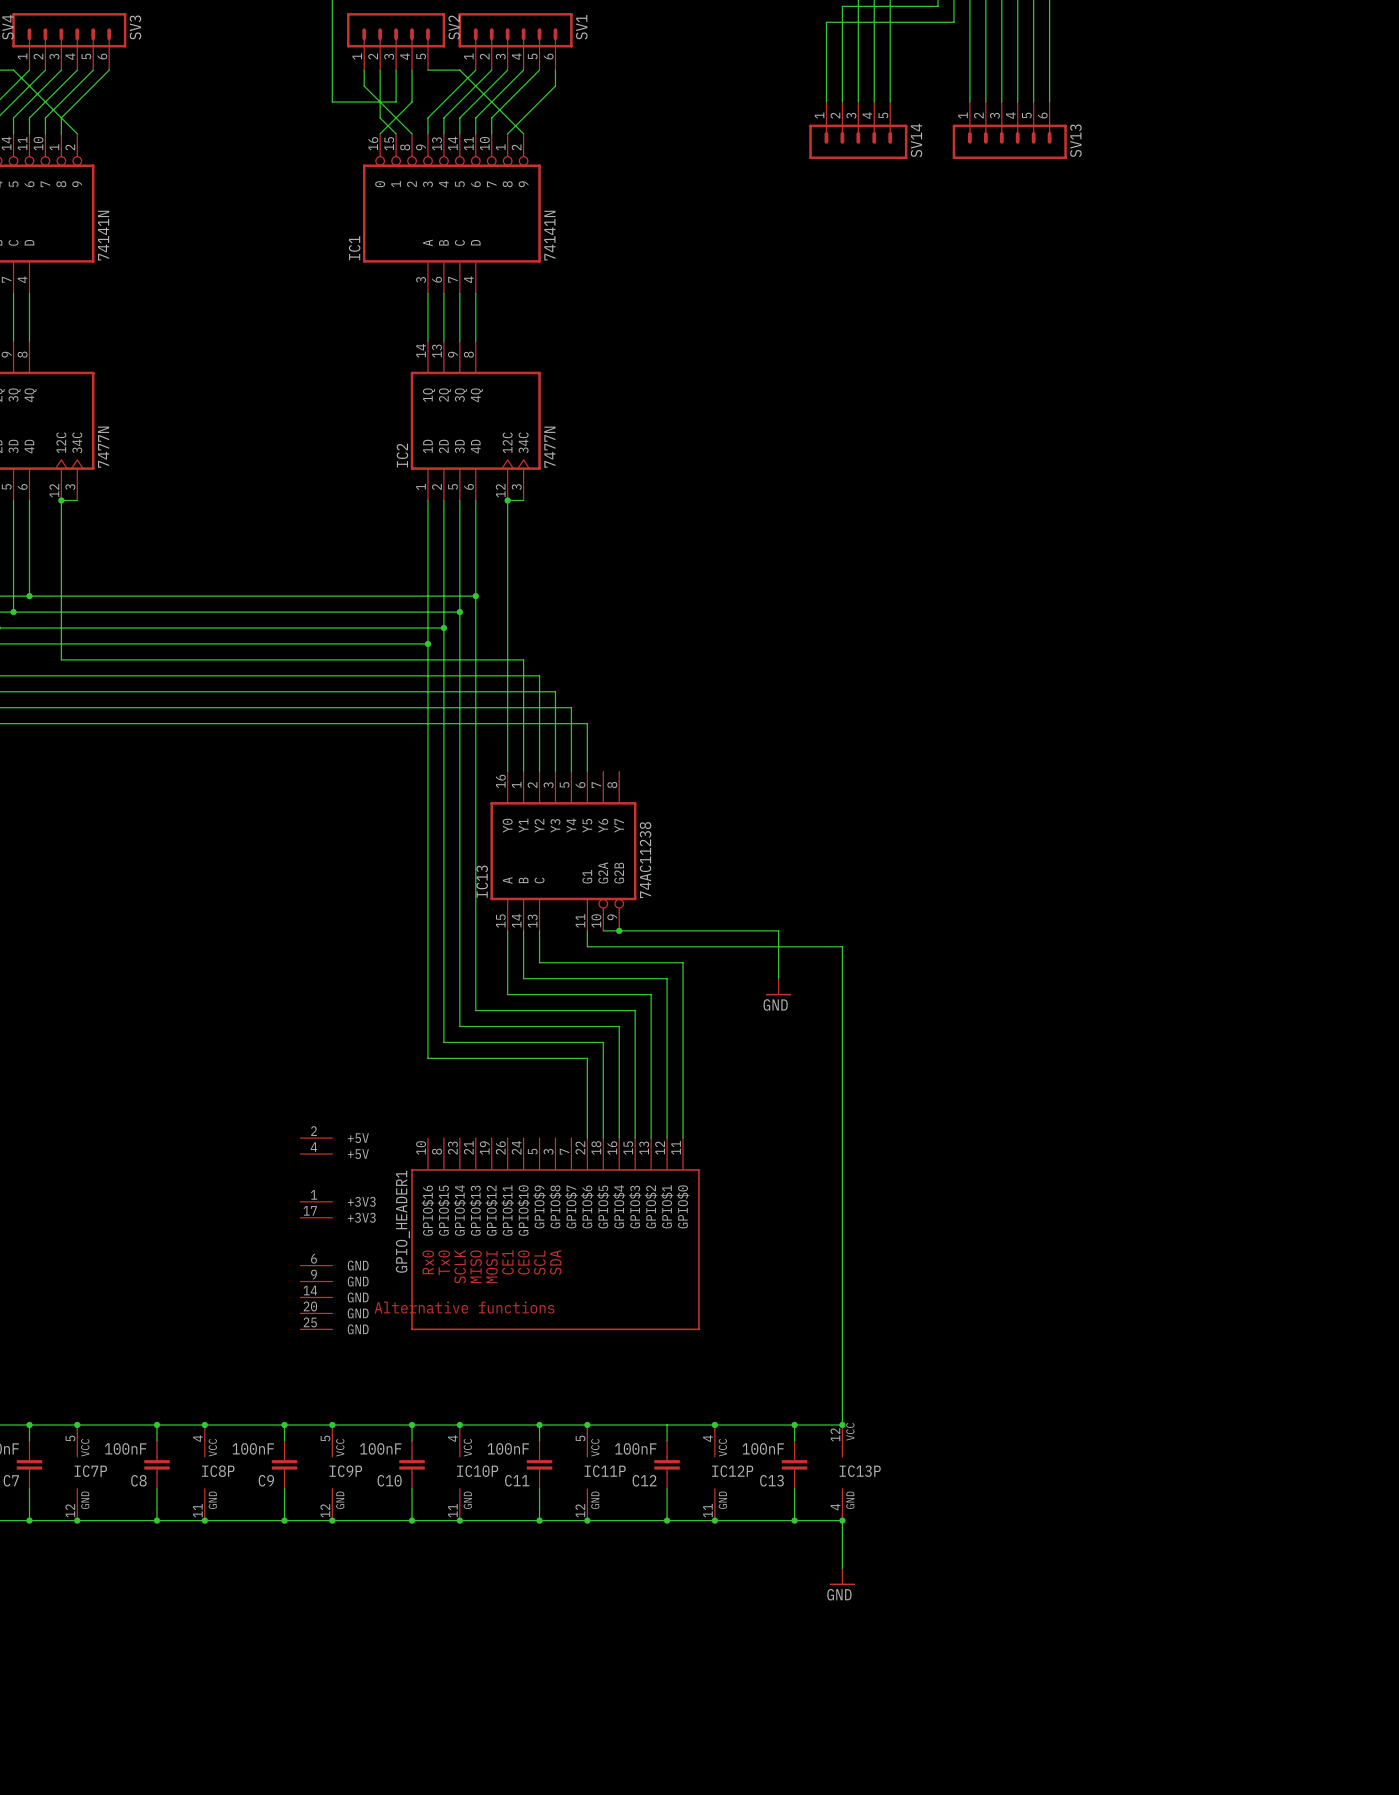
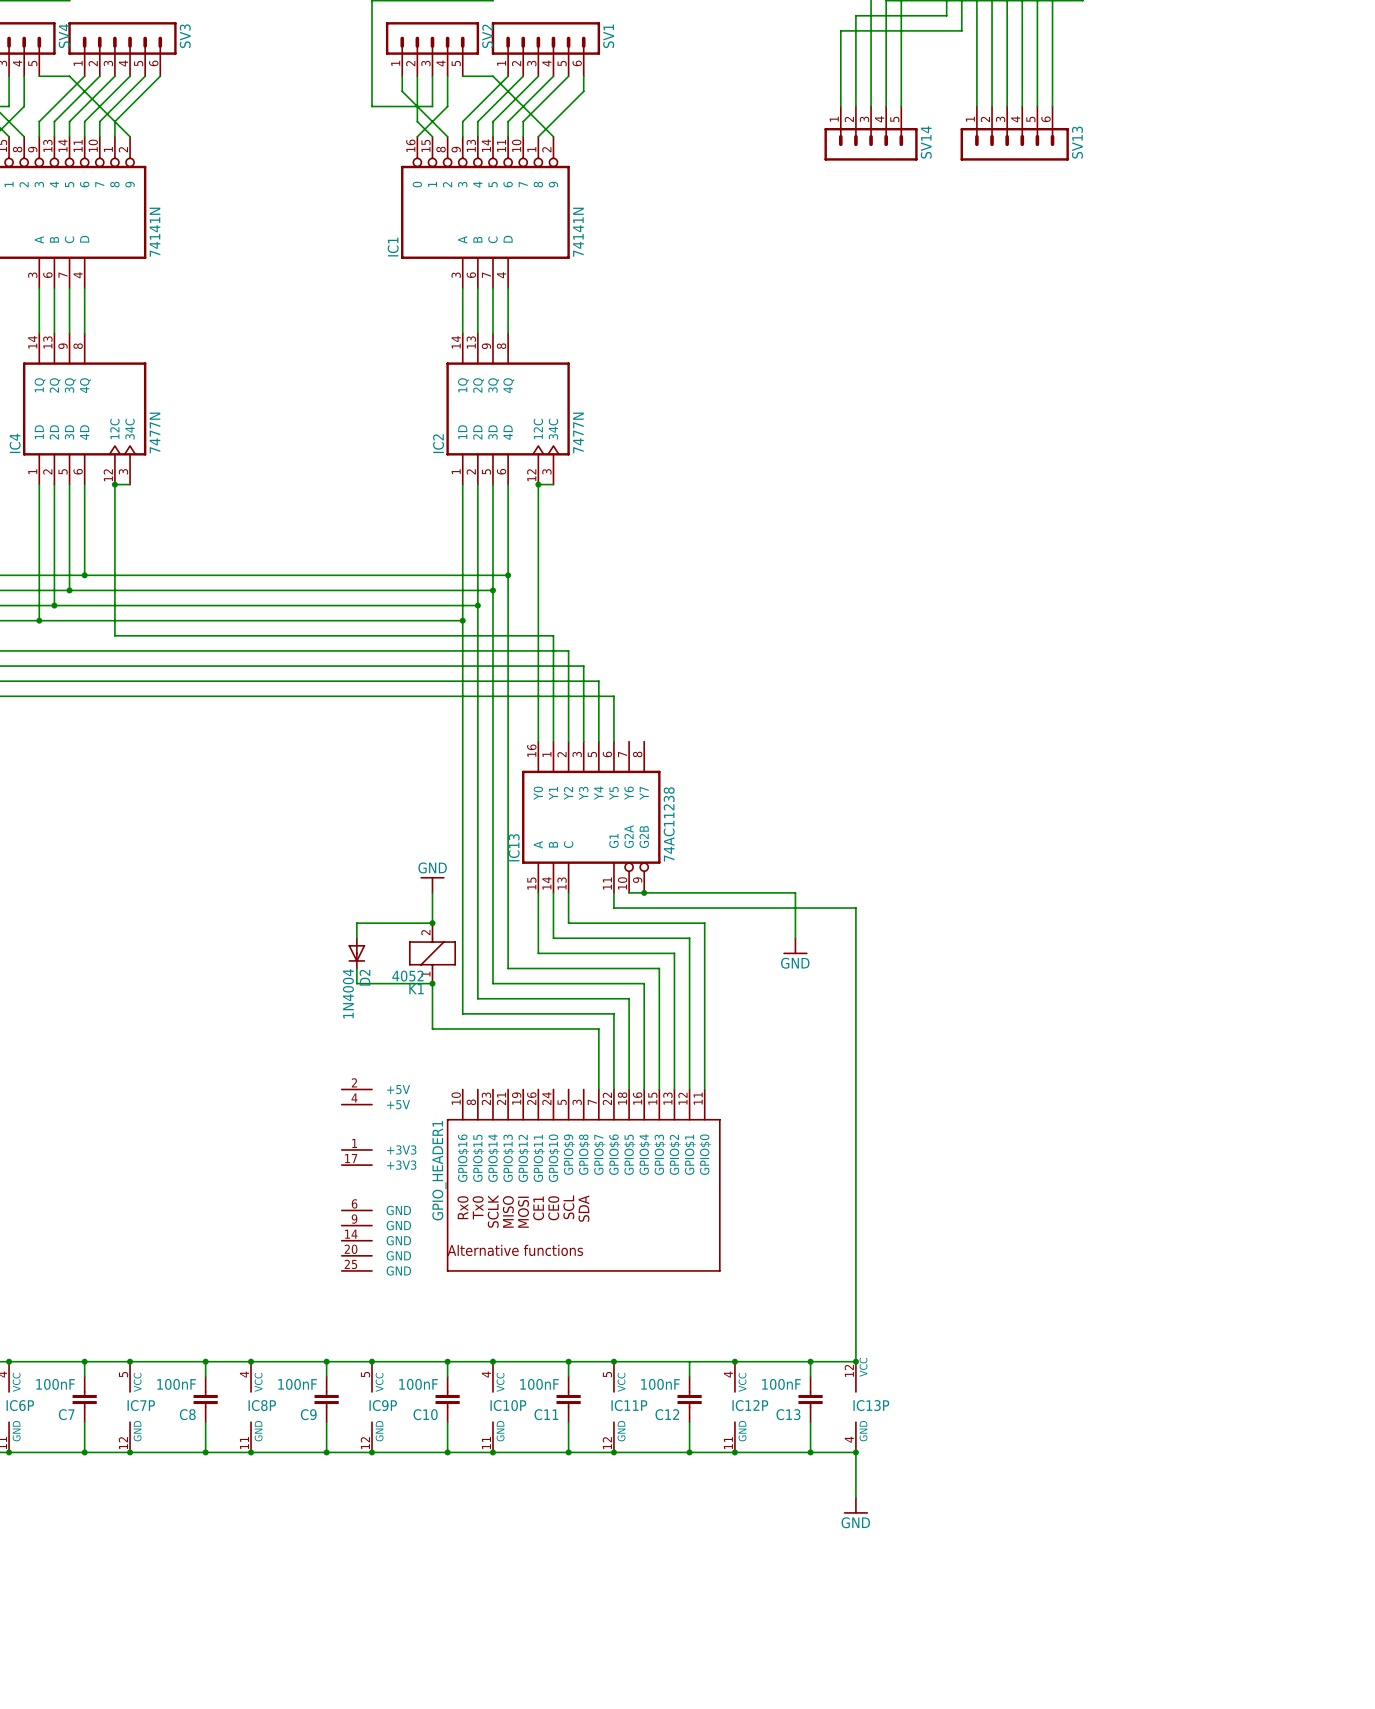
power symbol: none -> GND (432, 884)
wire: none -> (432, 892) (432, 923) (356, 923) (356, 938)
junction: none -> (432, 923)
D2: none -> 1N4004 (356, 953)
K1: none -> 4052 (432, 953)
wire: none -> (356, 968) (356, 983) (432, 983) (432, 1029) (598, 1029) (598, 1089)
junction: none -> (432, 983)

